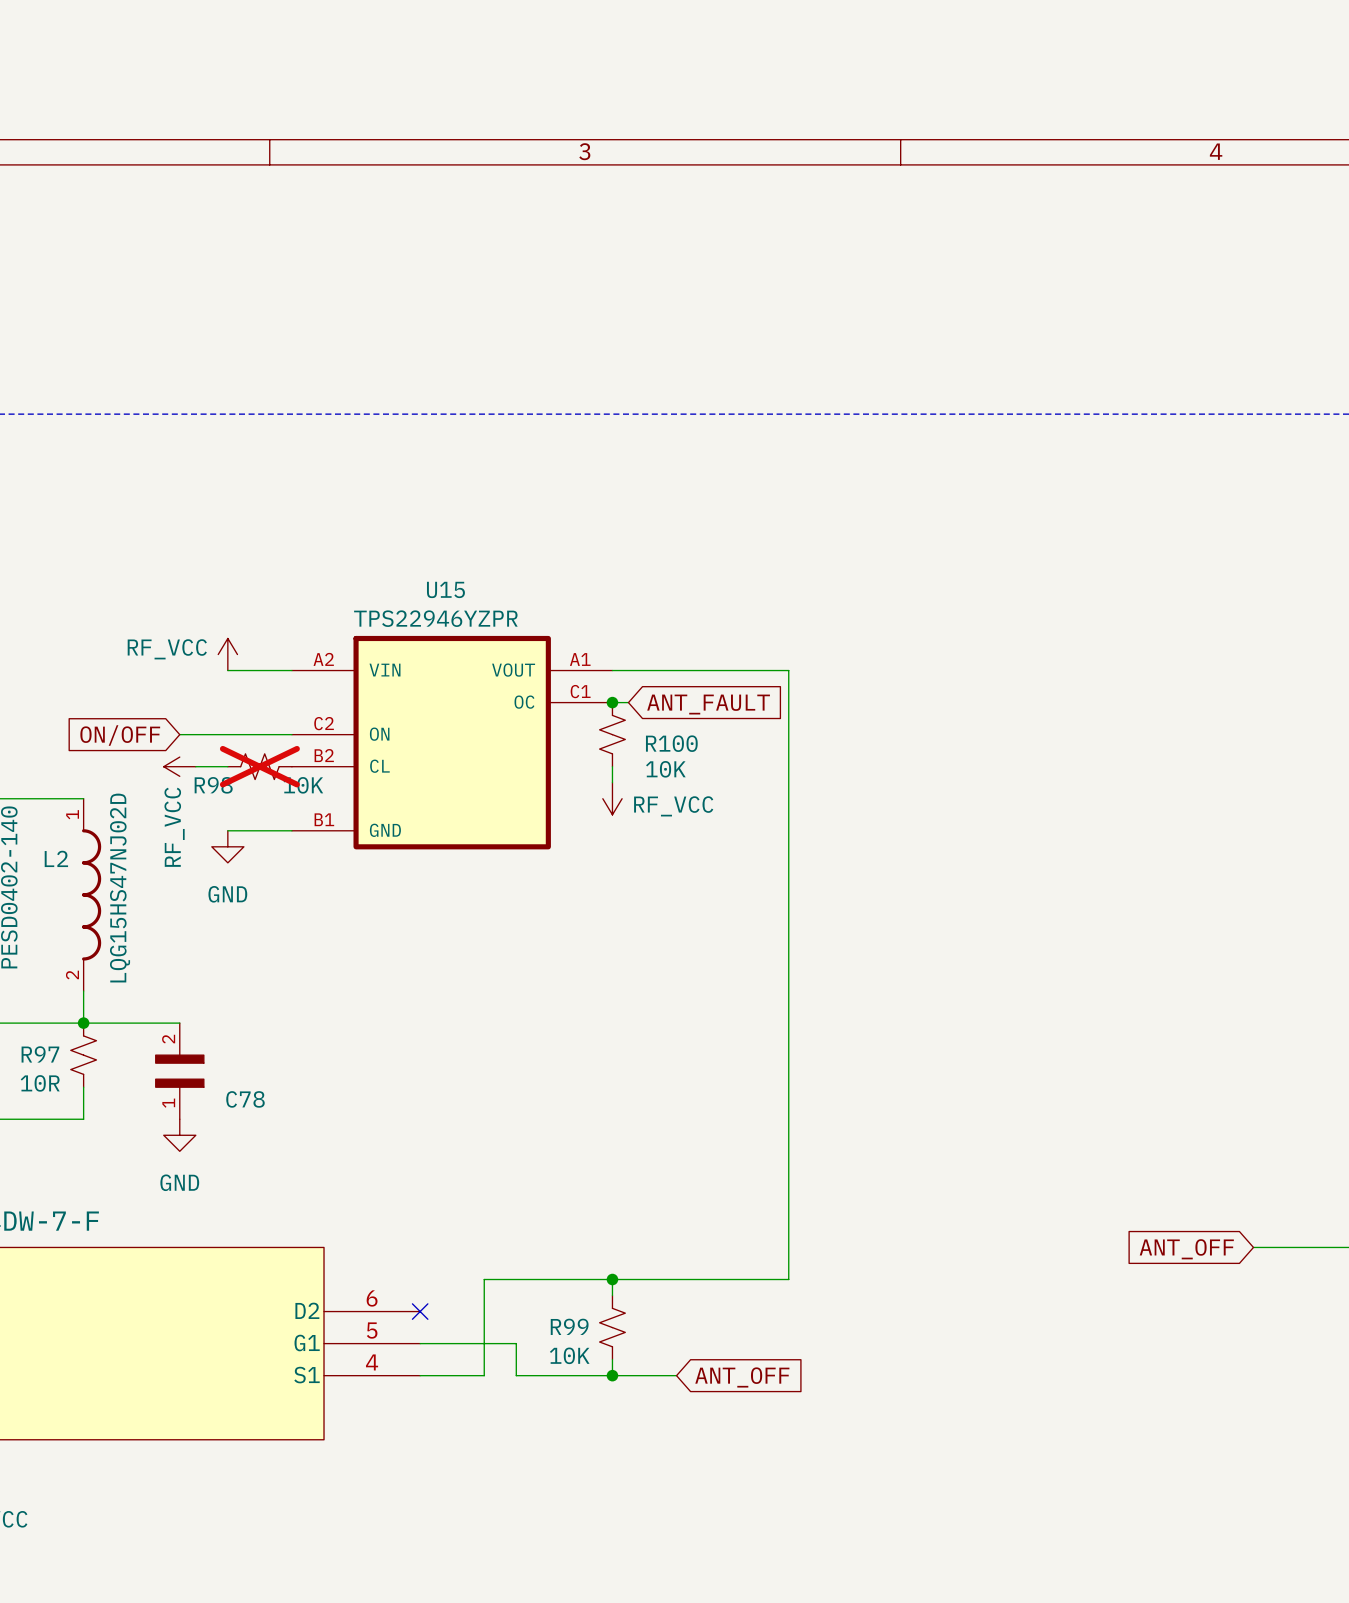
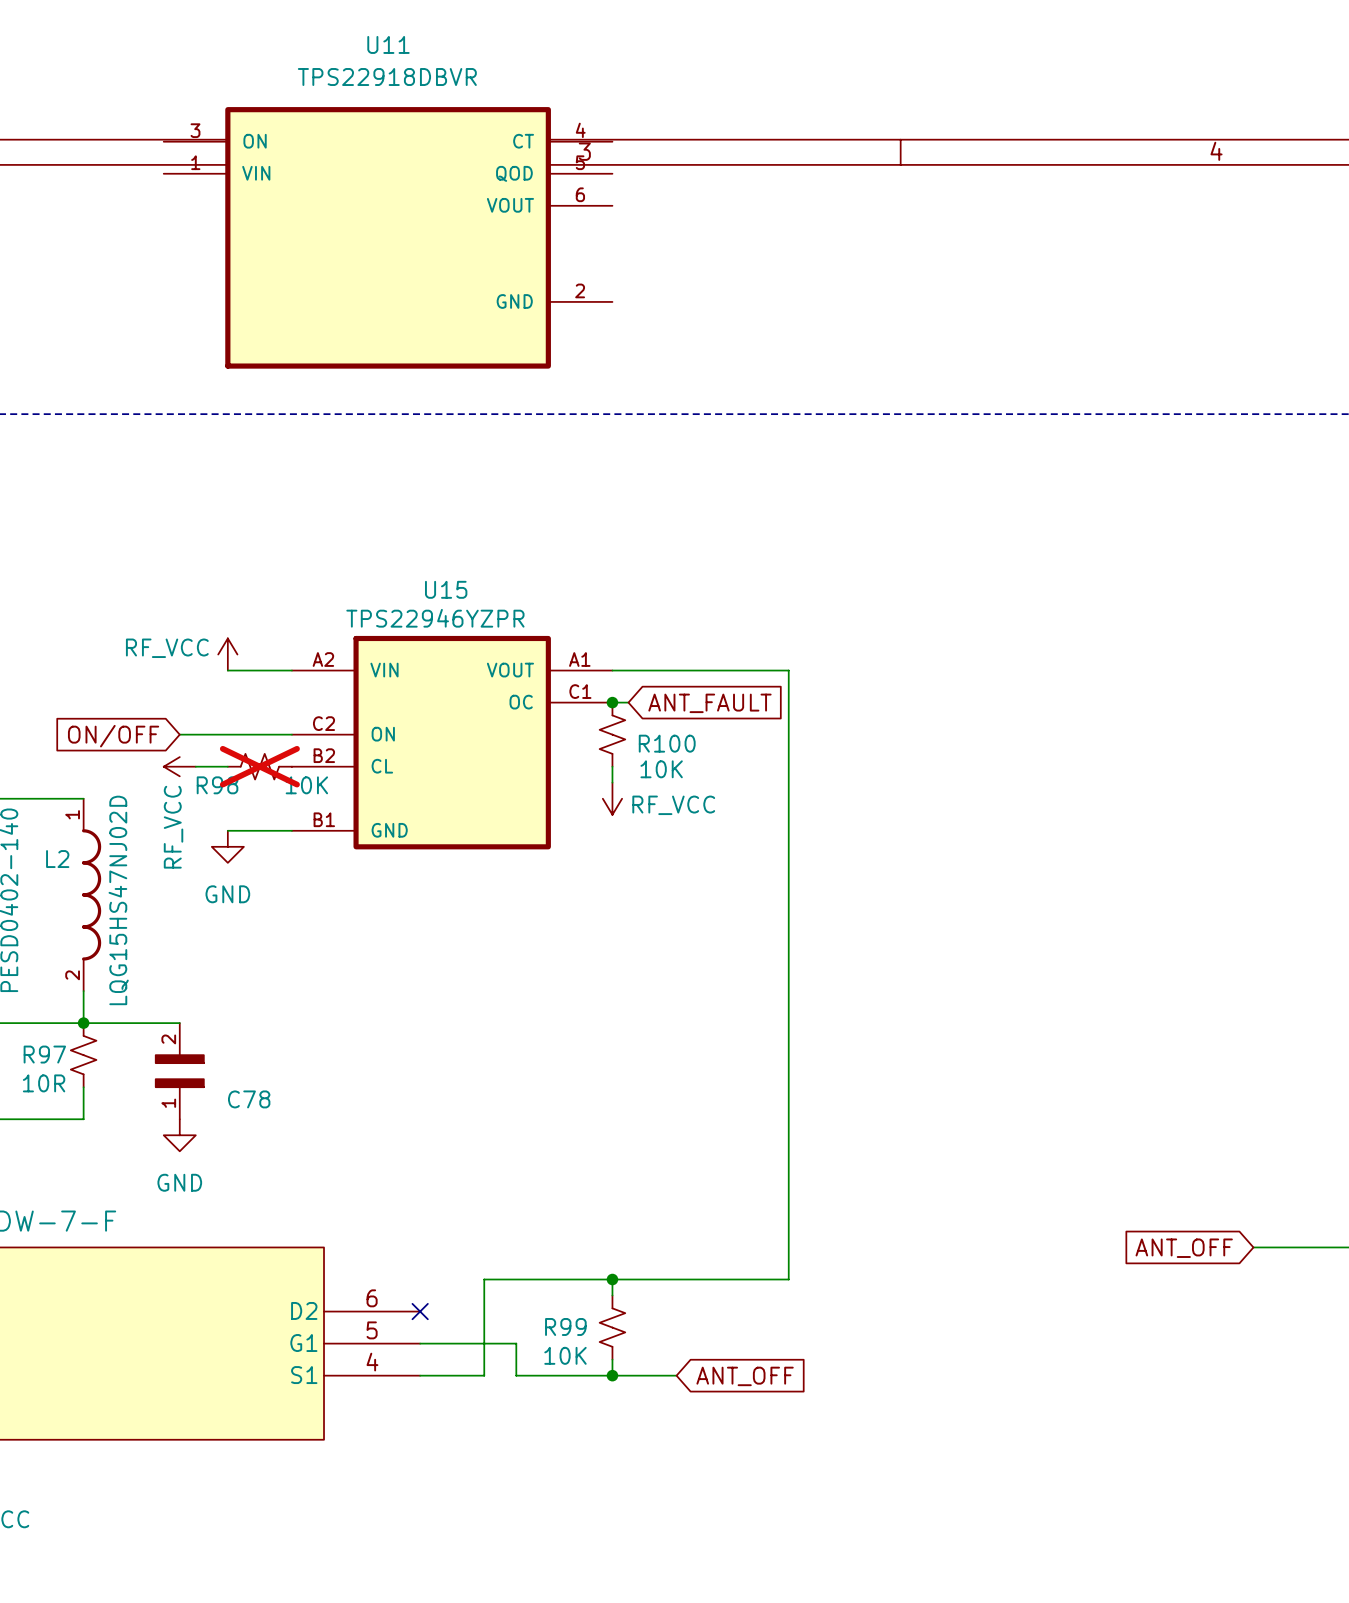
U11: none -> TPS22918DBVR (388, 237)

